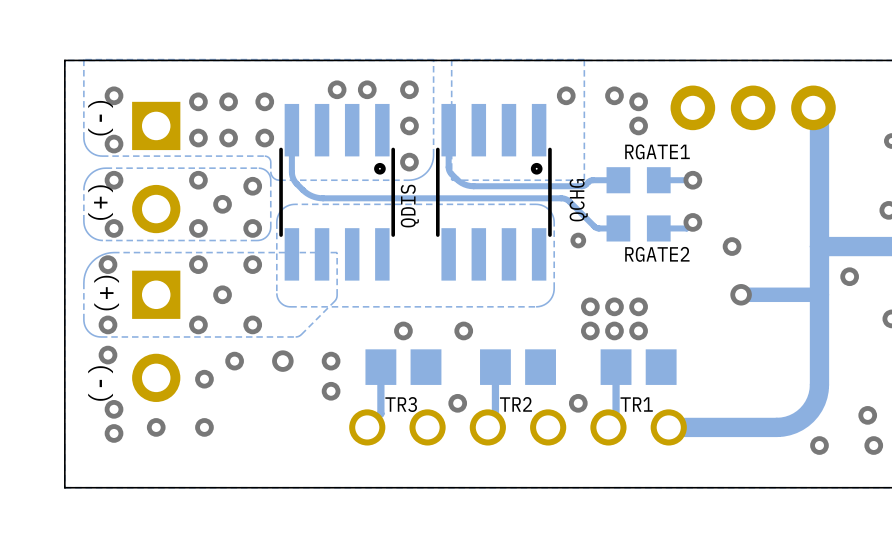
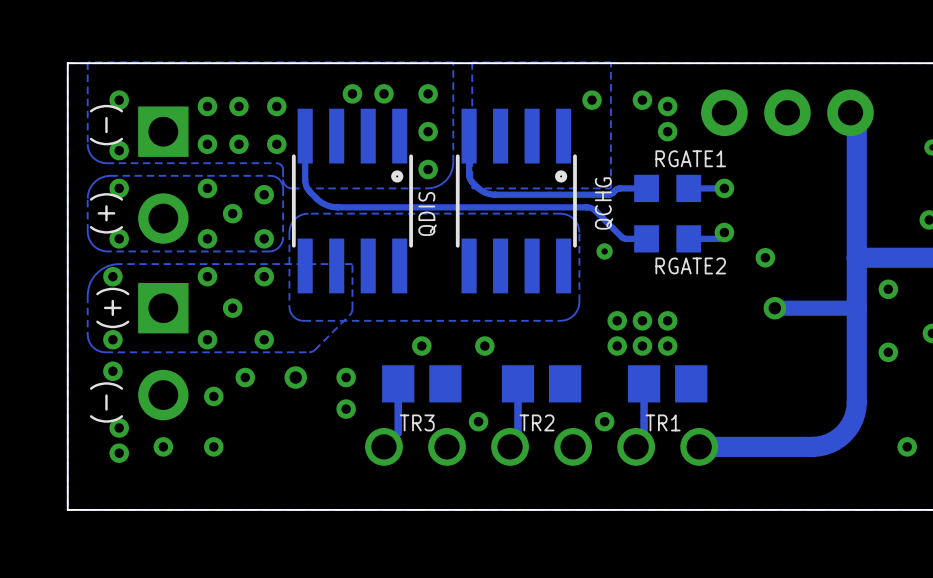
via: none -> (888, 352)
via: (867, 415) -> none
via: none -> (907, 446)
via: (819, 445) -> none
via: (873, 445) -> none

